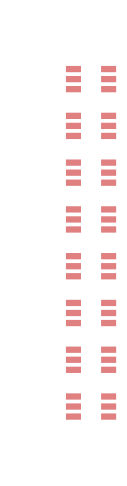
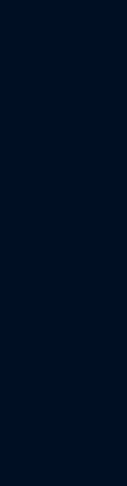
part: (91, 79) -> none
part: (91, 125) -> none
part: (91, 172) -> none
part: (91, 219) -> none
part: (91, 266) -> none
part: (91, 312) -> none
part: (91, 359) -> none
part: (91, 406) -> none

